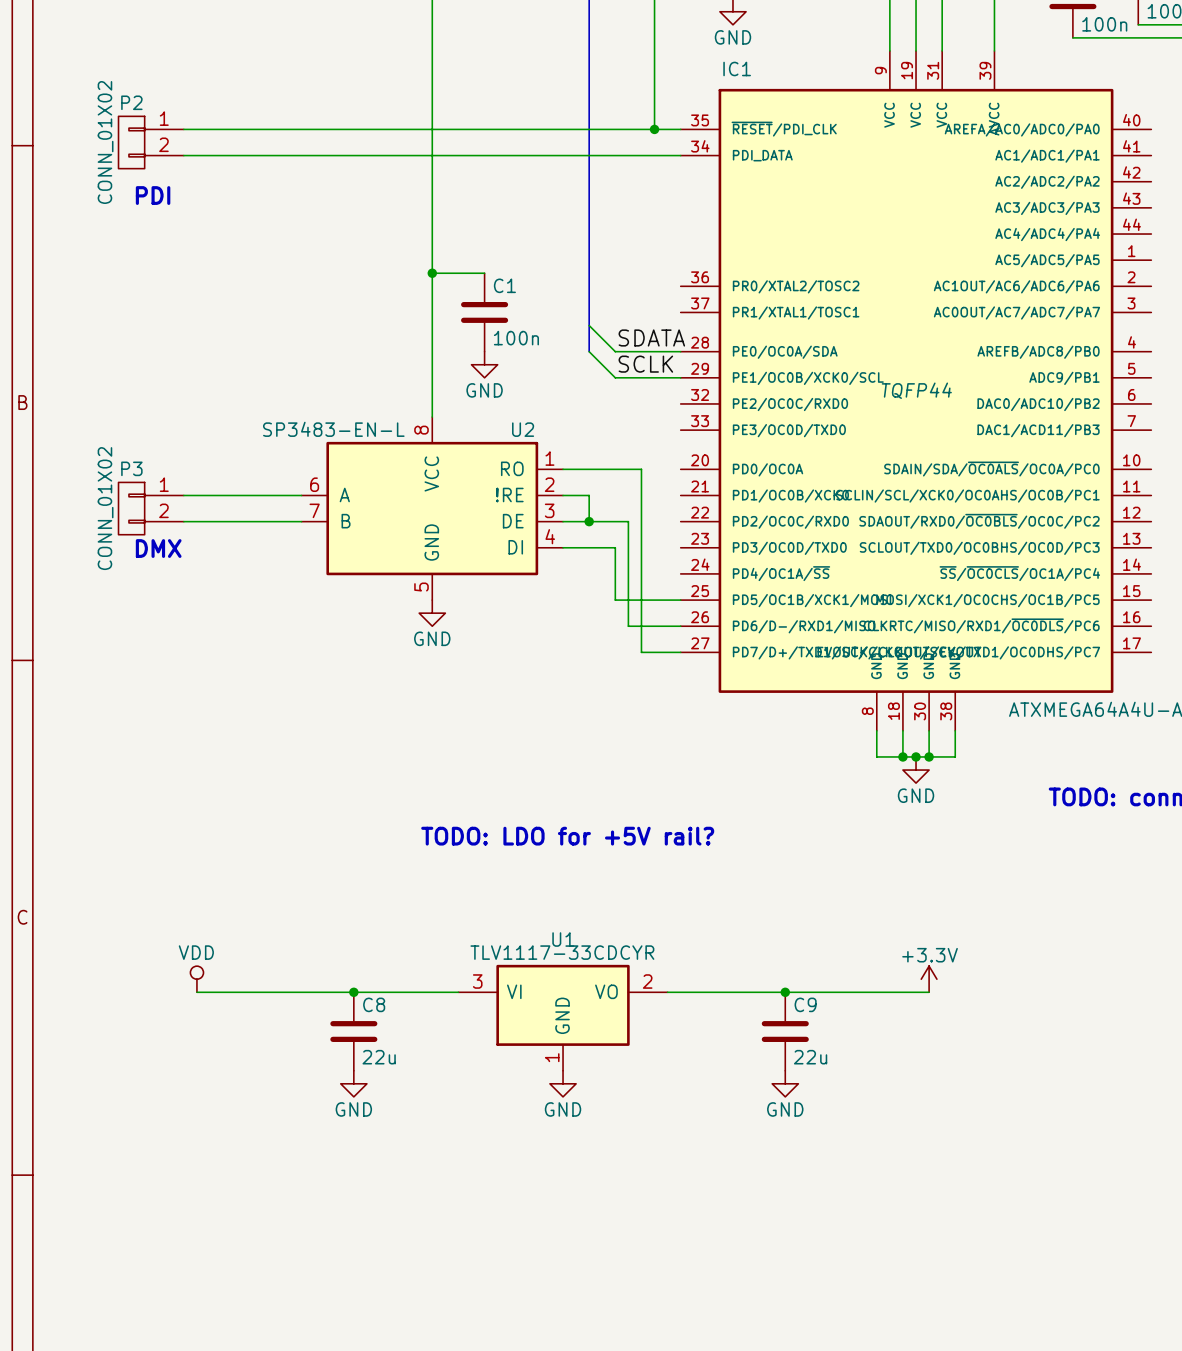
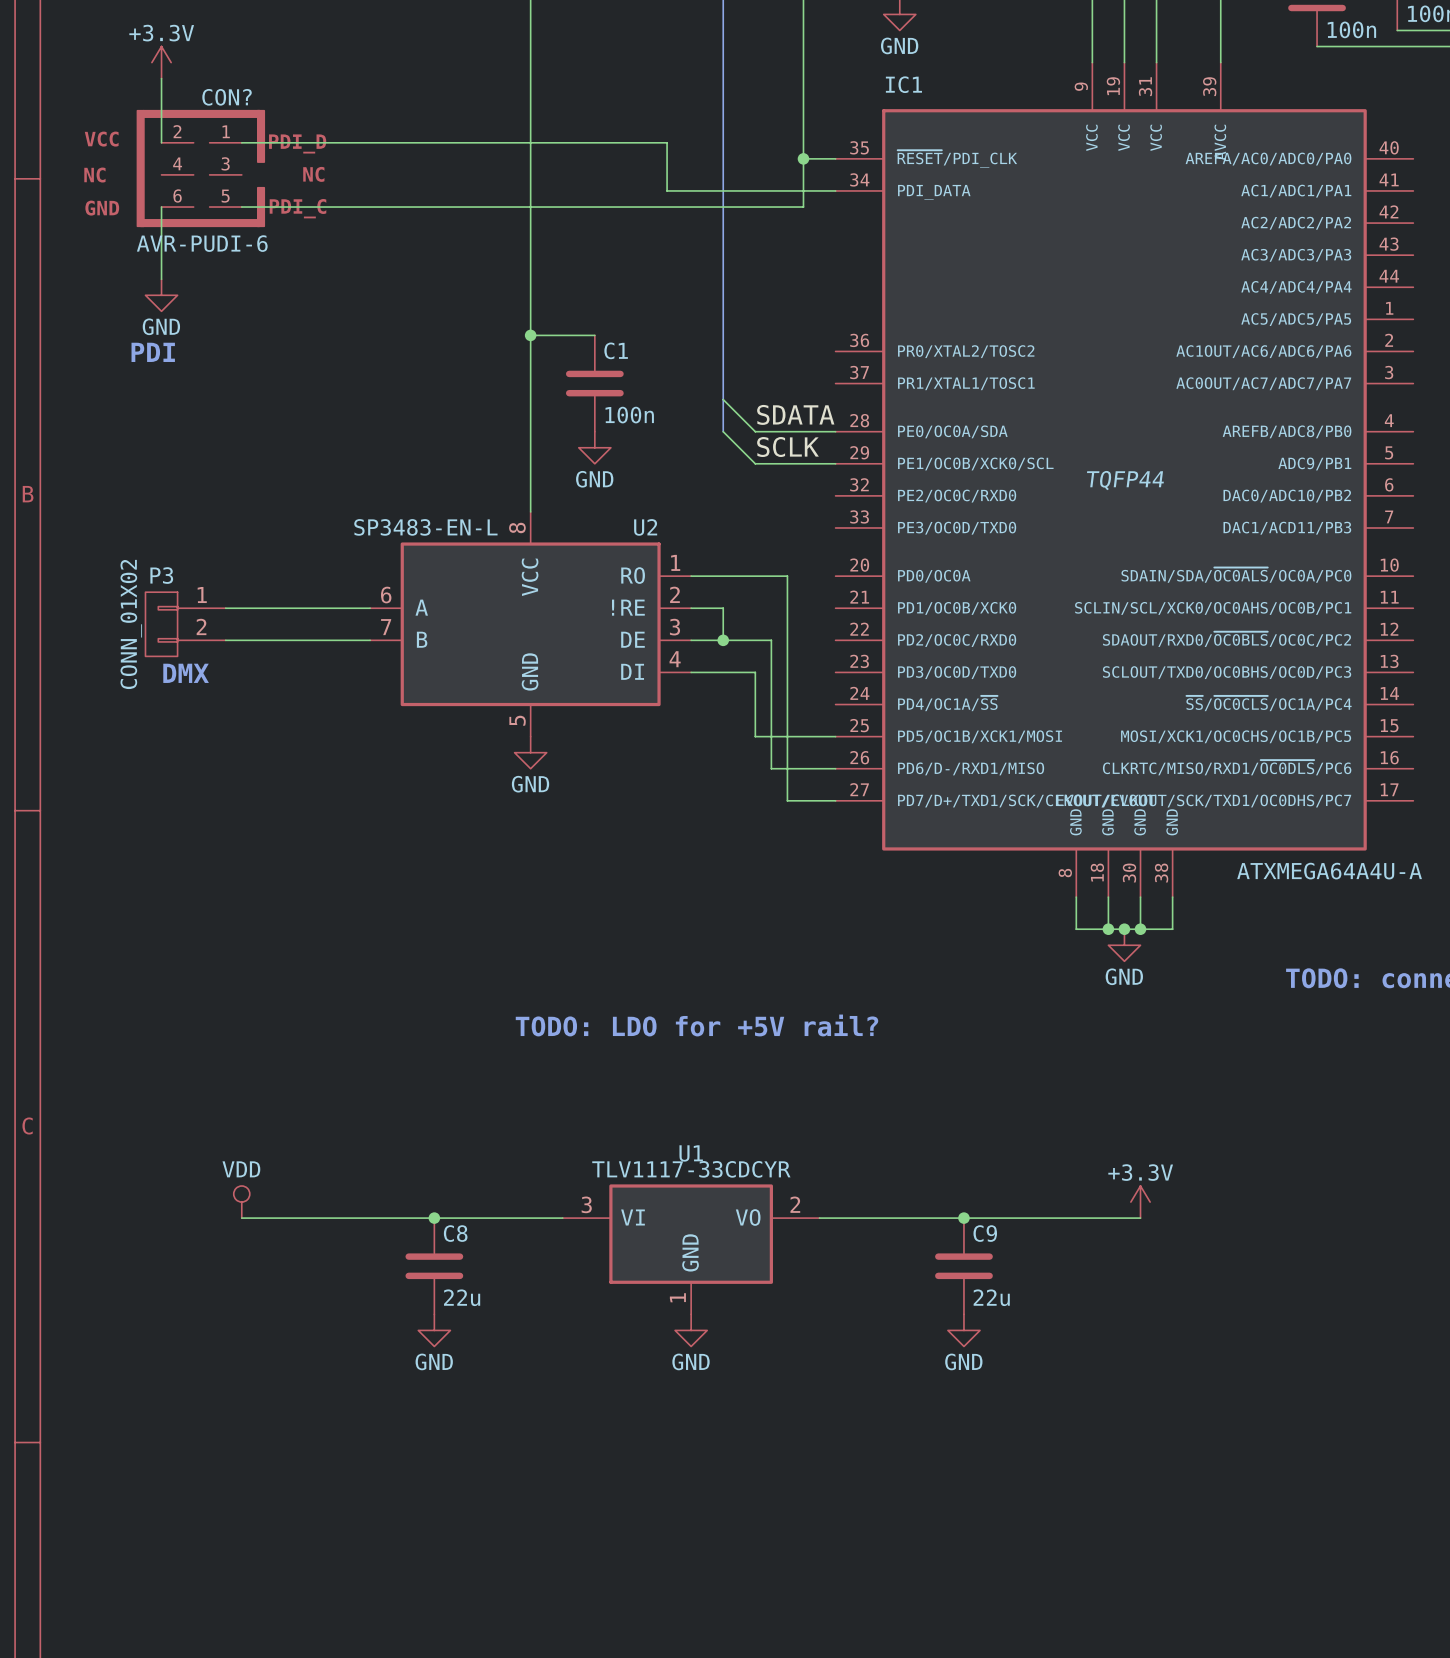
power symbol: none -> +3.3V (161, 62)
wire: none -> (161, 78) (161, 142)
wire: (183, 129) (654, 129) -> (241, 207) (803, 207) (803, 158)
CON?: none -> AVR-PUDI-6 (200, 168)
P2: CONN_01X02 (151, 142) -> none
wire: (183, 155) (543, 155) -> (241, 142) (667, 142) (667, 190)
wire: none -> (161, 207) (161, 279)
text position: PDI (153, 195) -> PDI (153, 352)
power symbol: none -> GND (161, 295)

